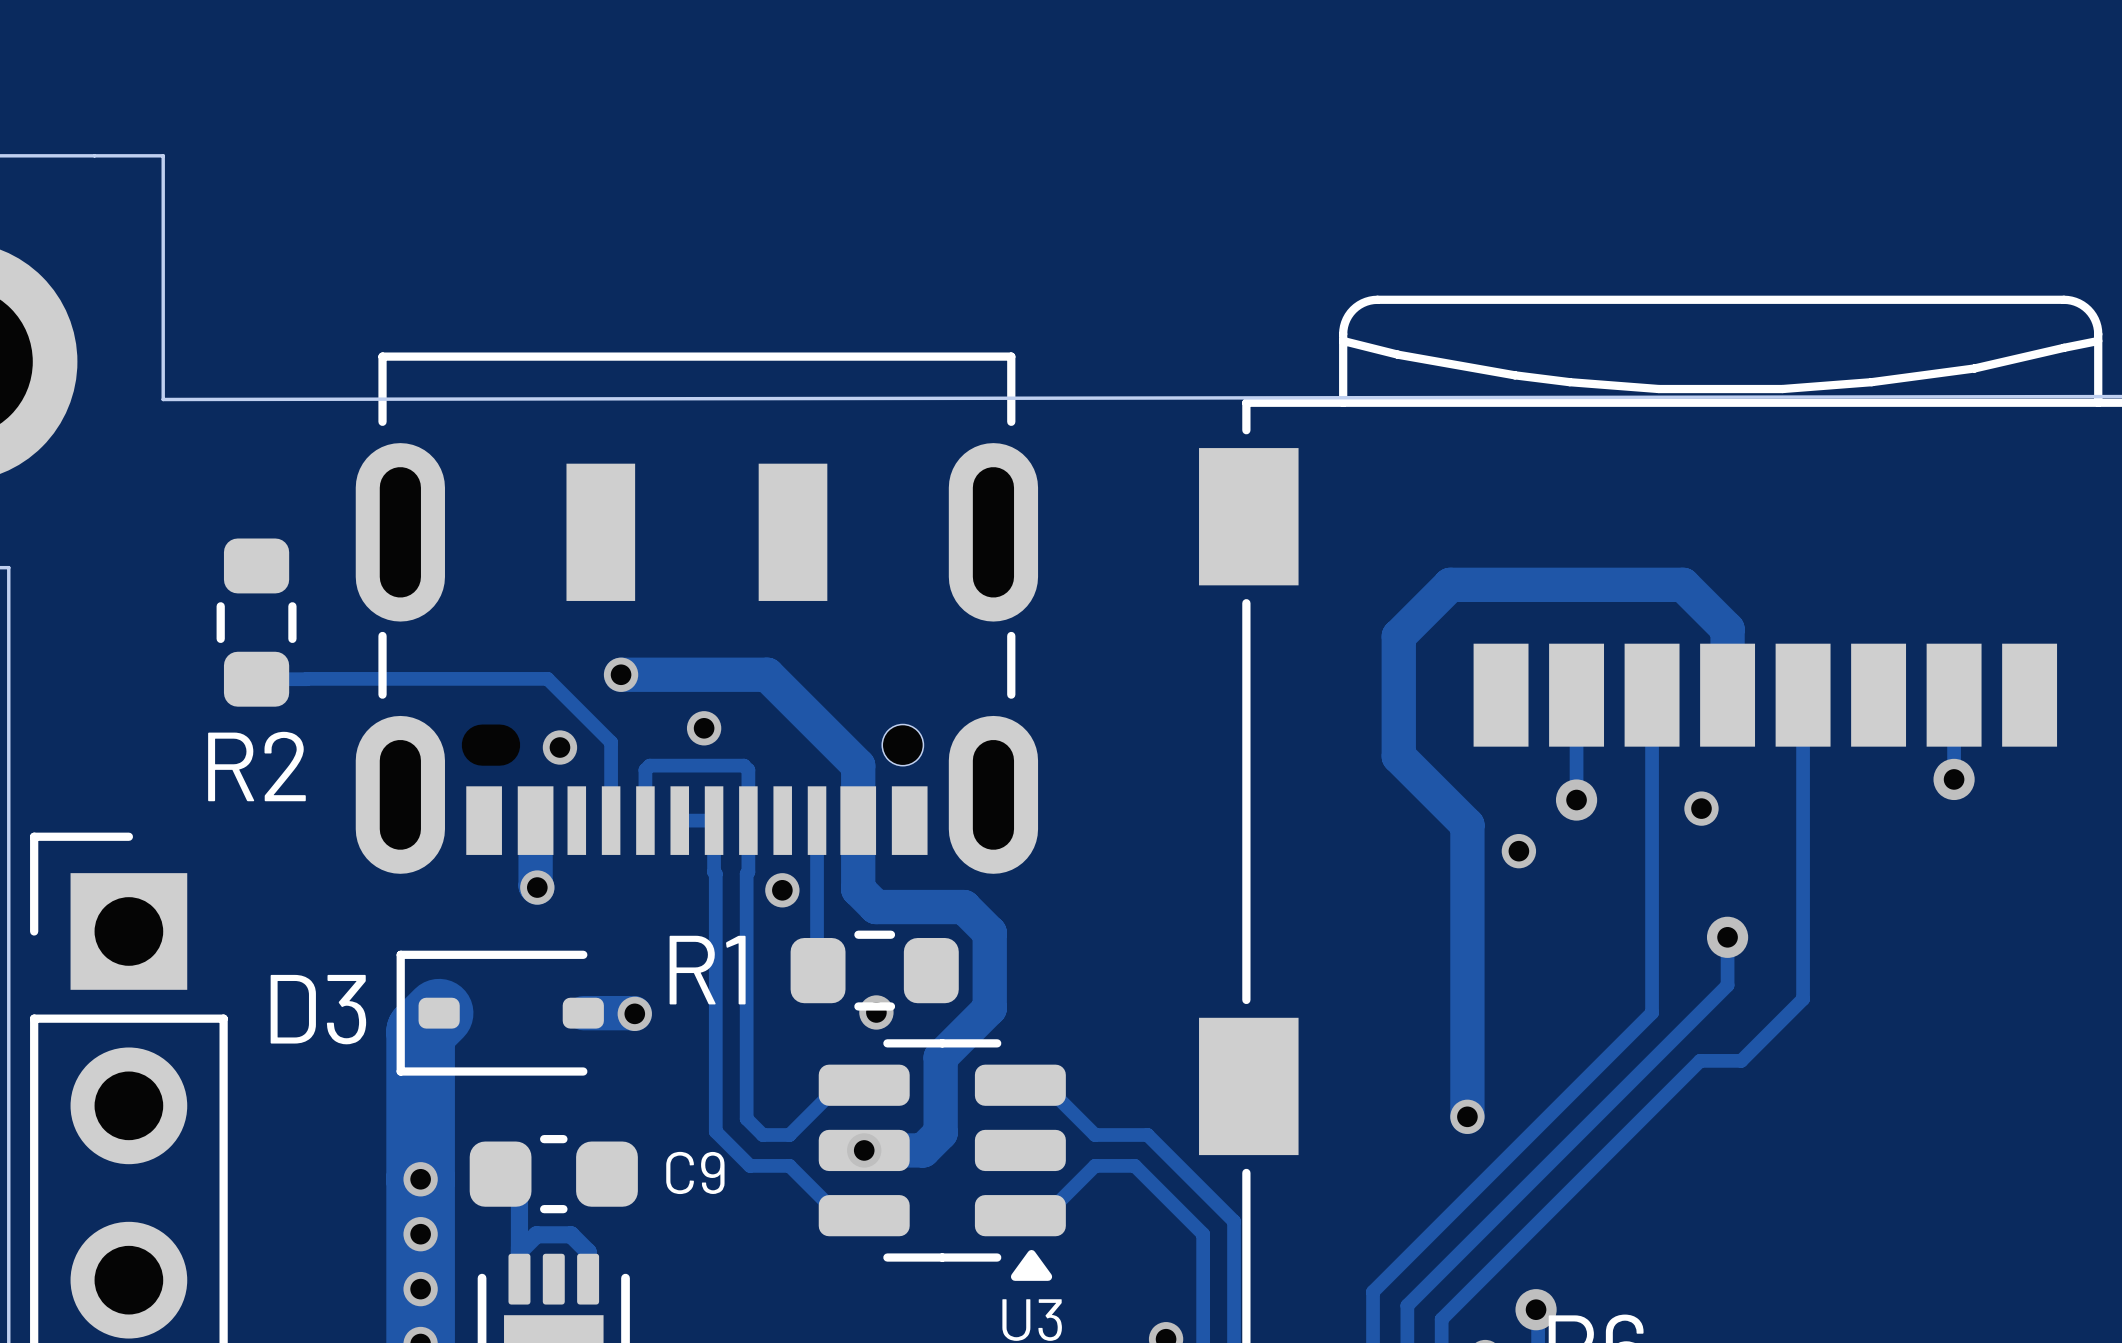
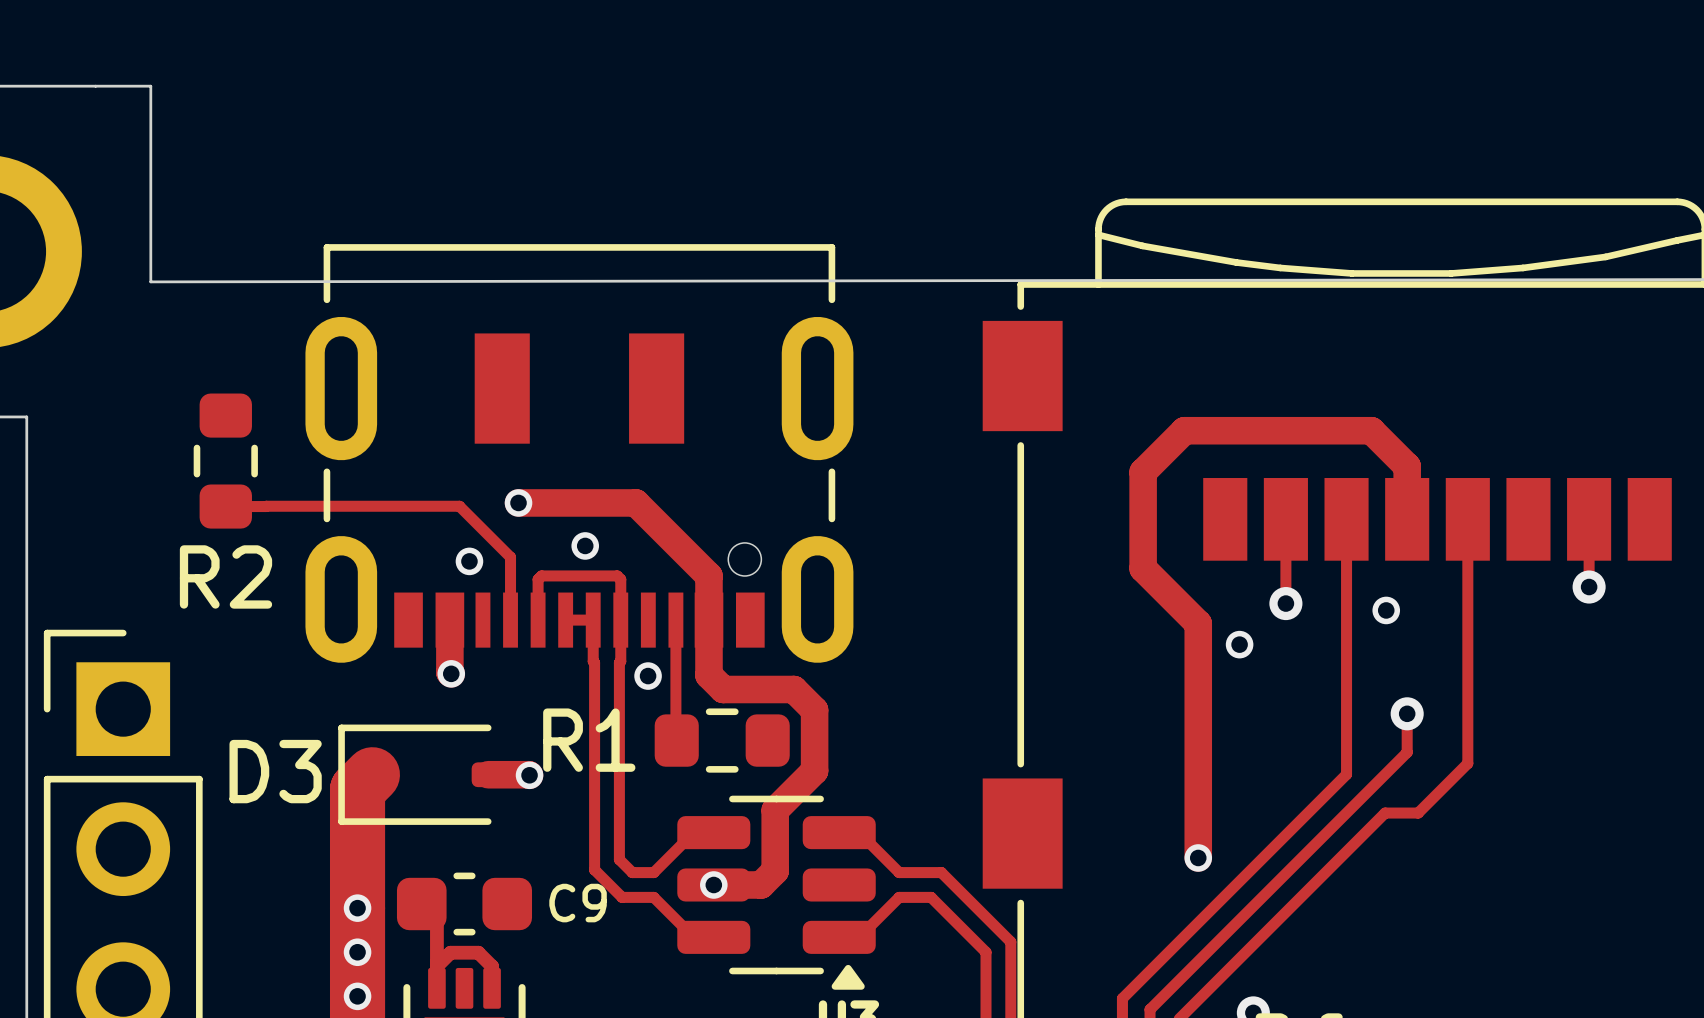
via: (876, 1012) -> none

